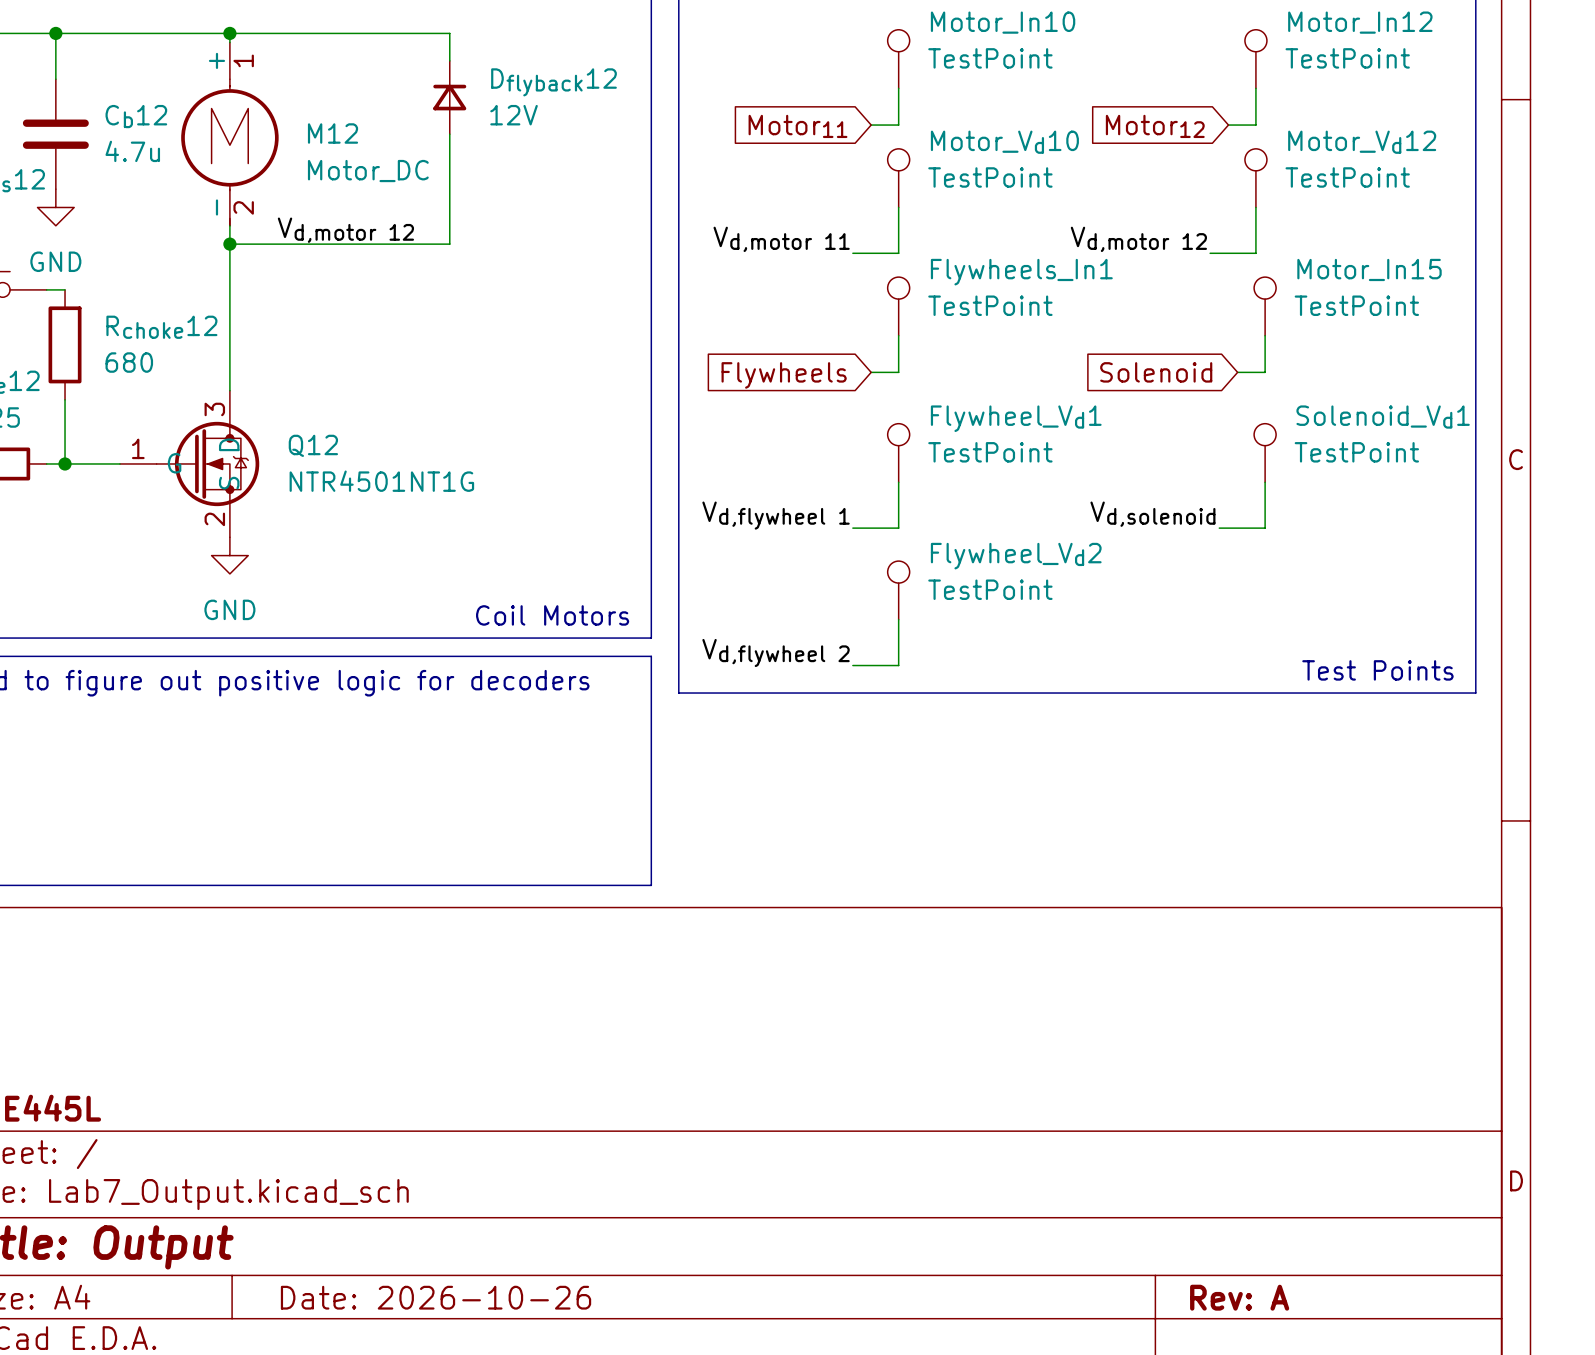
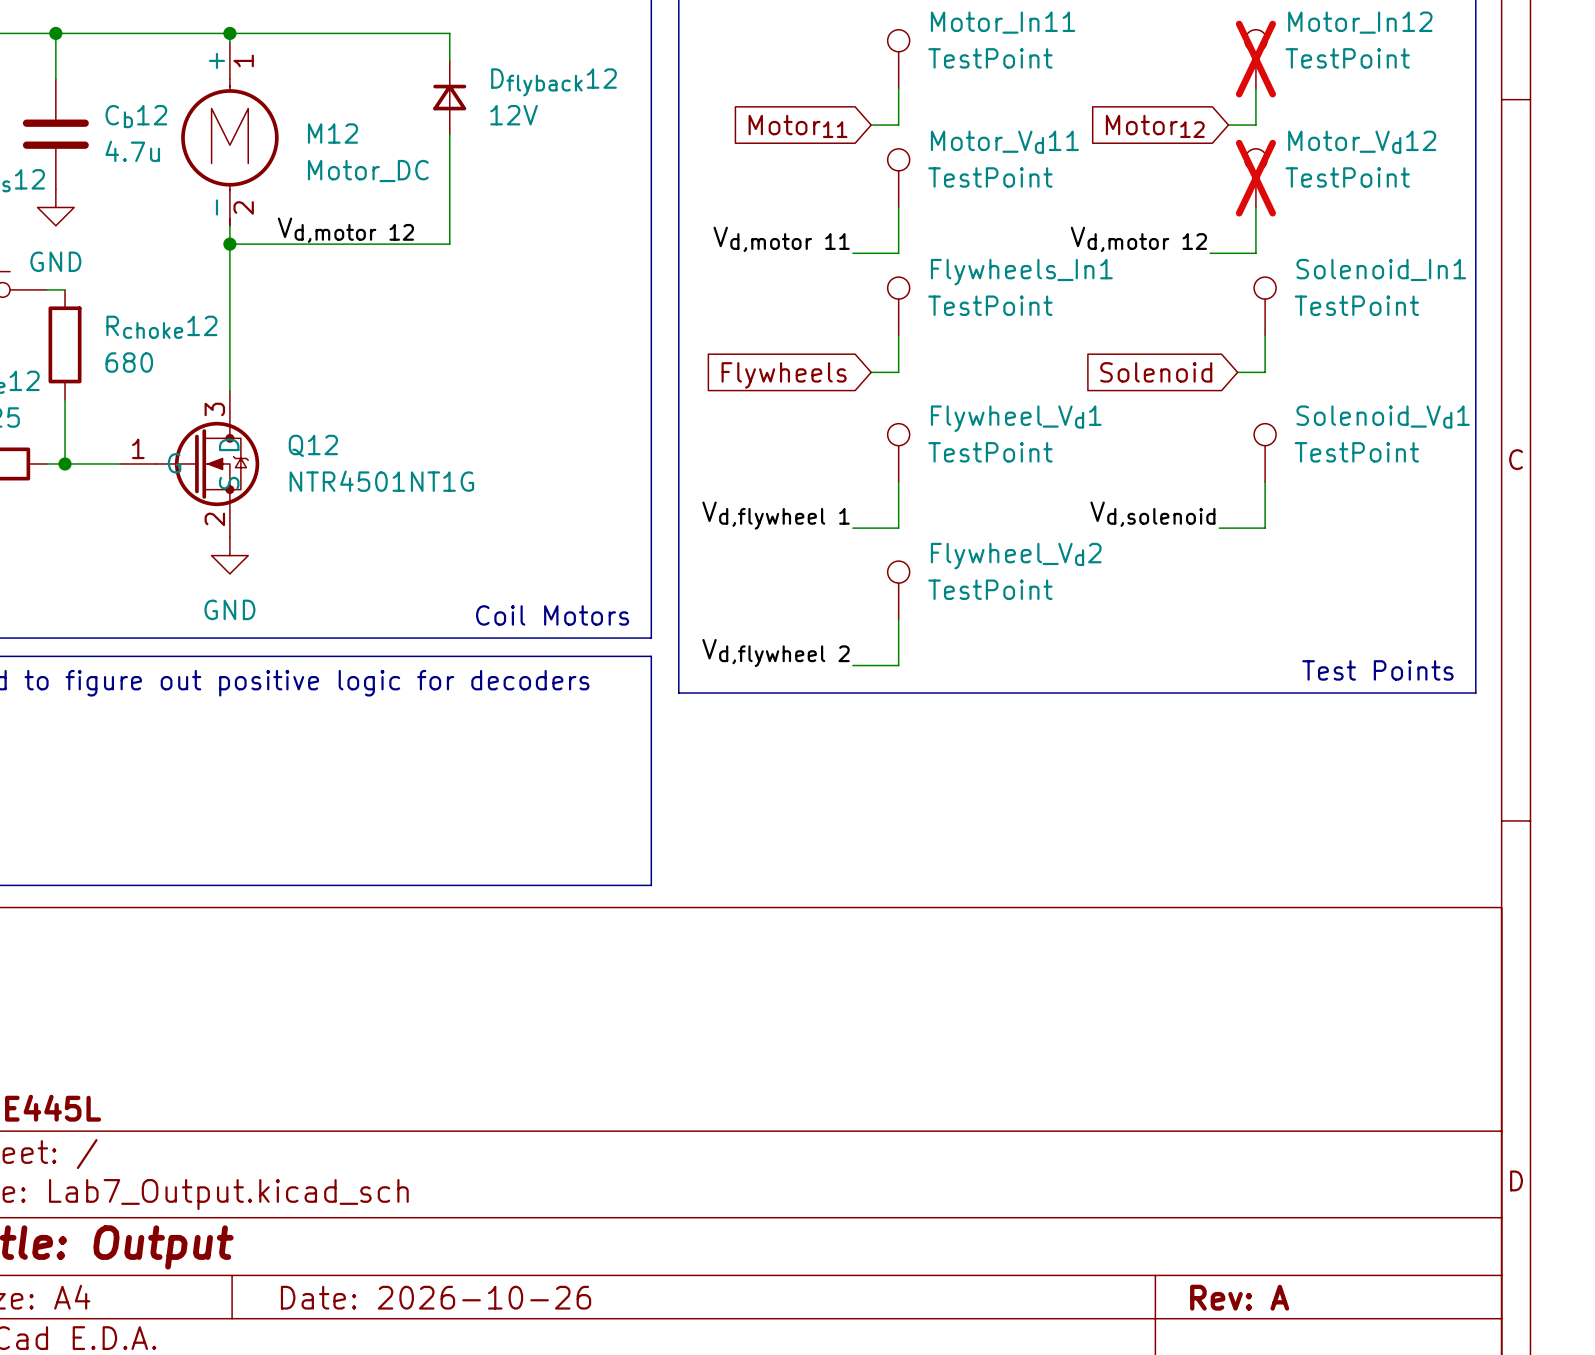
Motor_In10 name: Motor_In10 (1003, 22) -> Motor_In11 (1003, 22)
Motor_In12 do-not-place cross: none -> (1255, 59)
Motor_Vd10 name: Motor_Vd10 (1004, 142) -> Motor_Vd11 (1004, 142)
Motor_Vd12 do-not-place cross: none -> (1255, 178)
Motor_In15 name: Motor_In15 (1369, 269) -> Solenoid_In1 (1381, 269)

